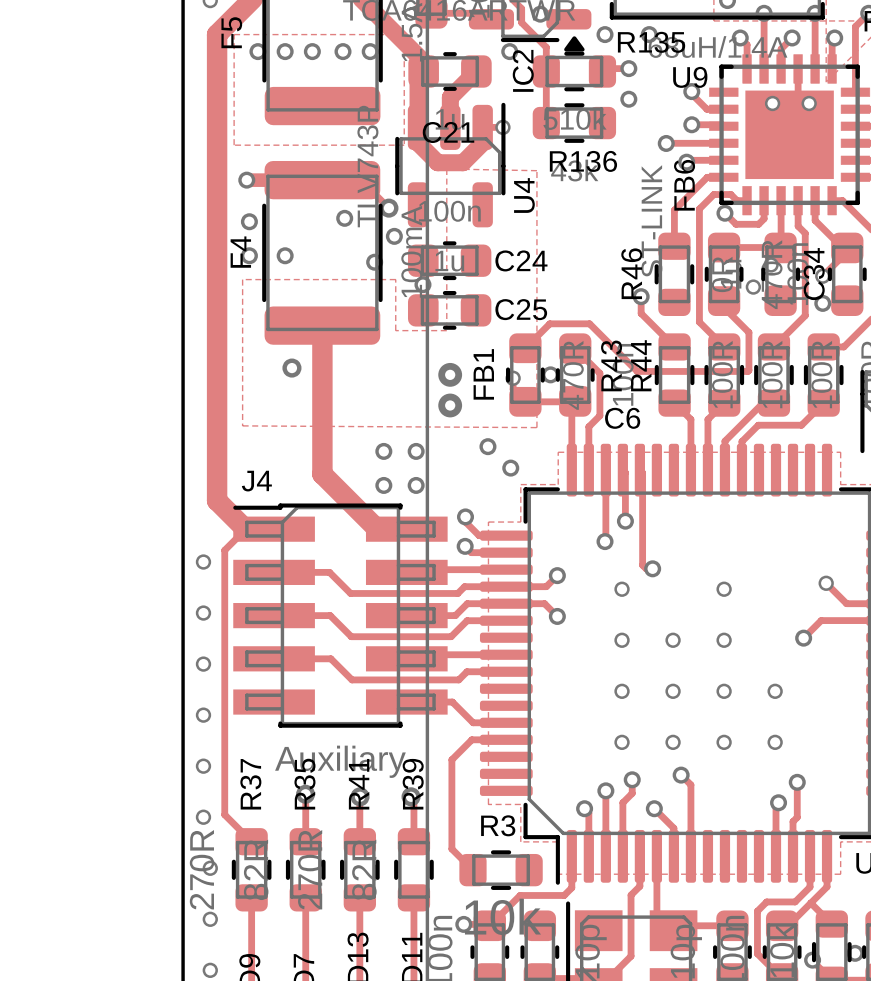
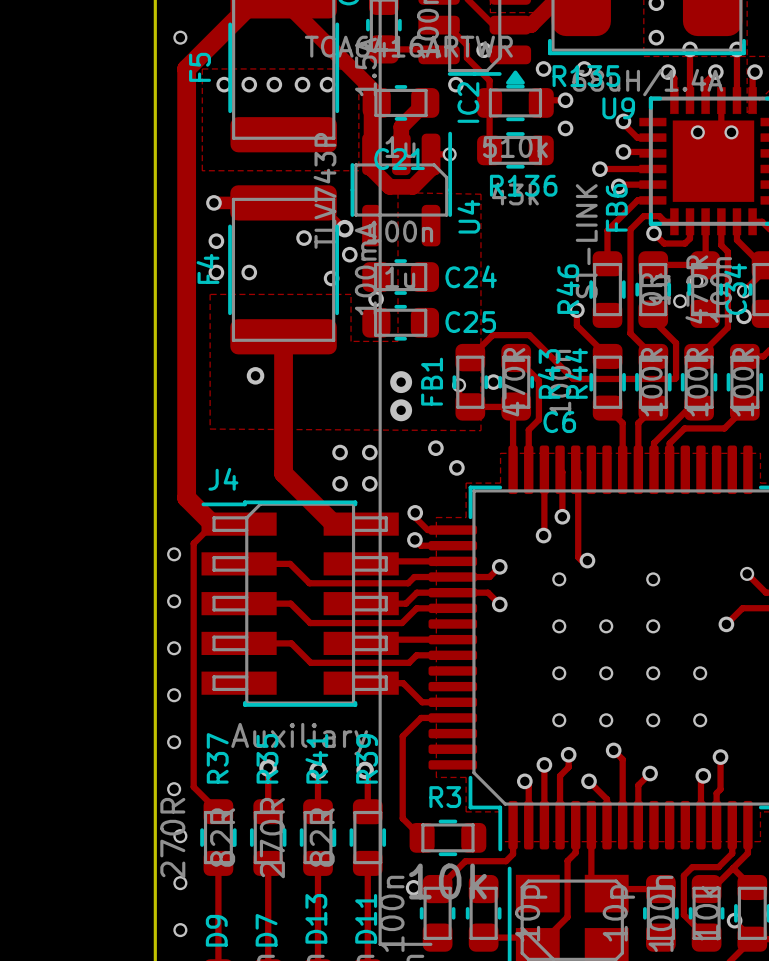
track: none -> (650, 773) (638, 785) (638, 825)
via: none -> (650, 773)

